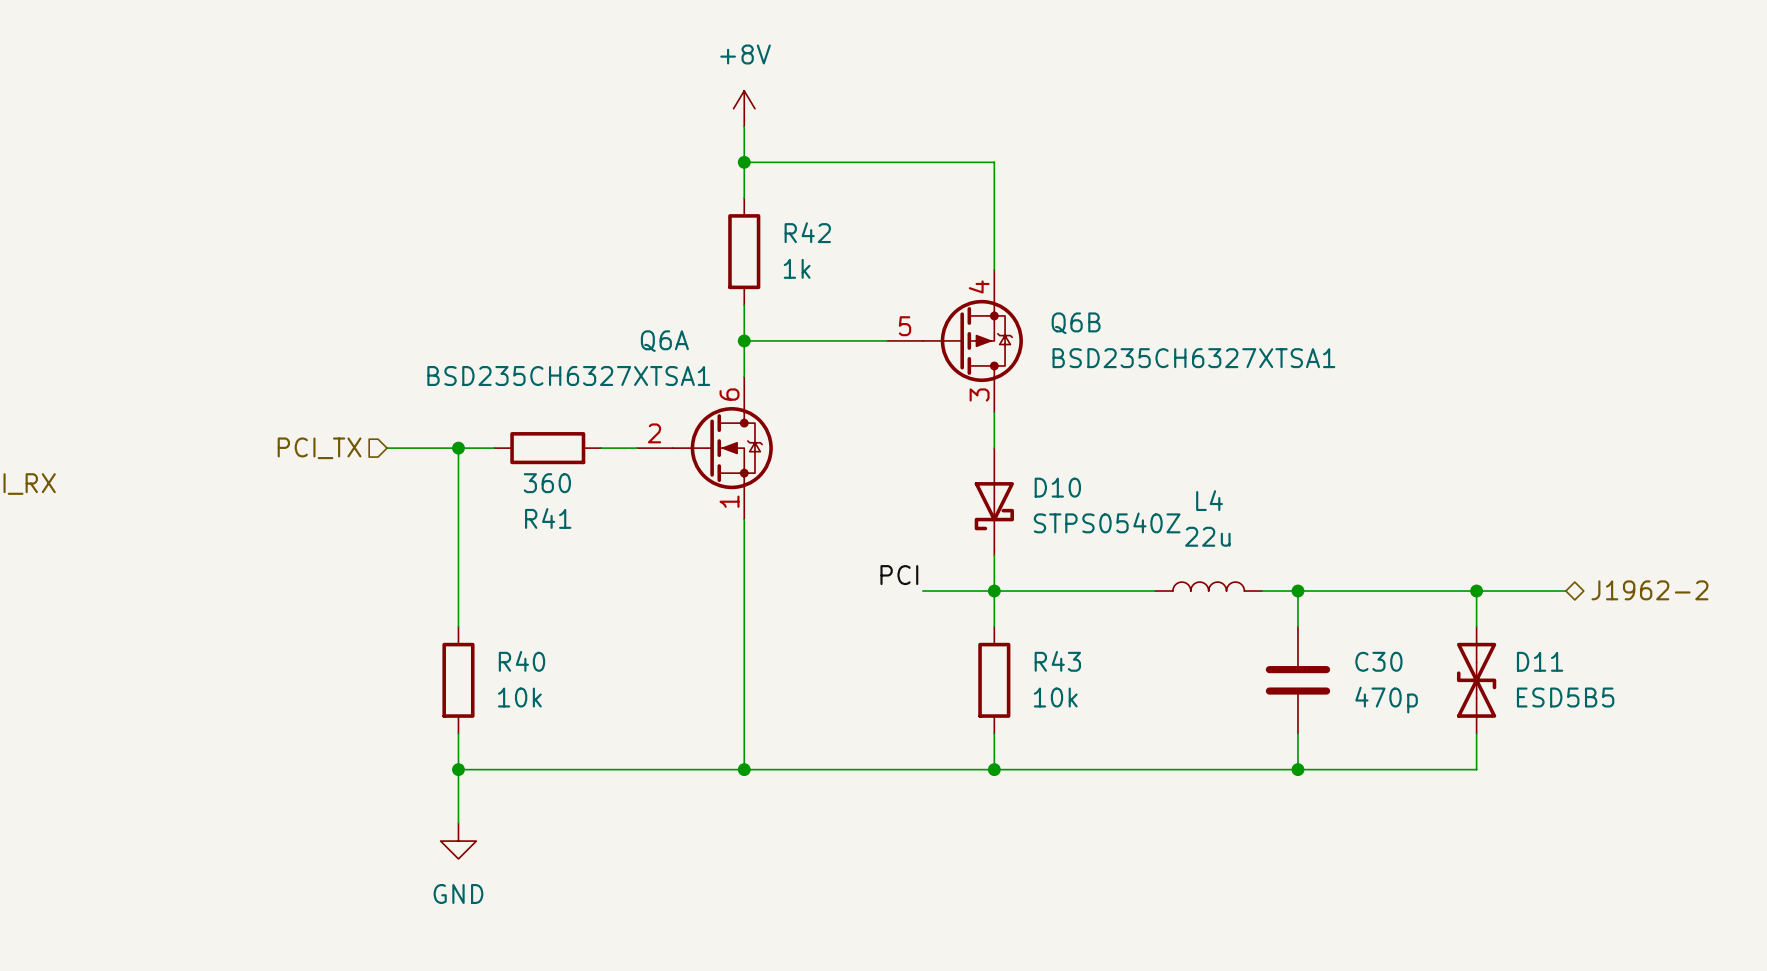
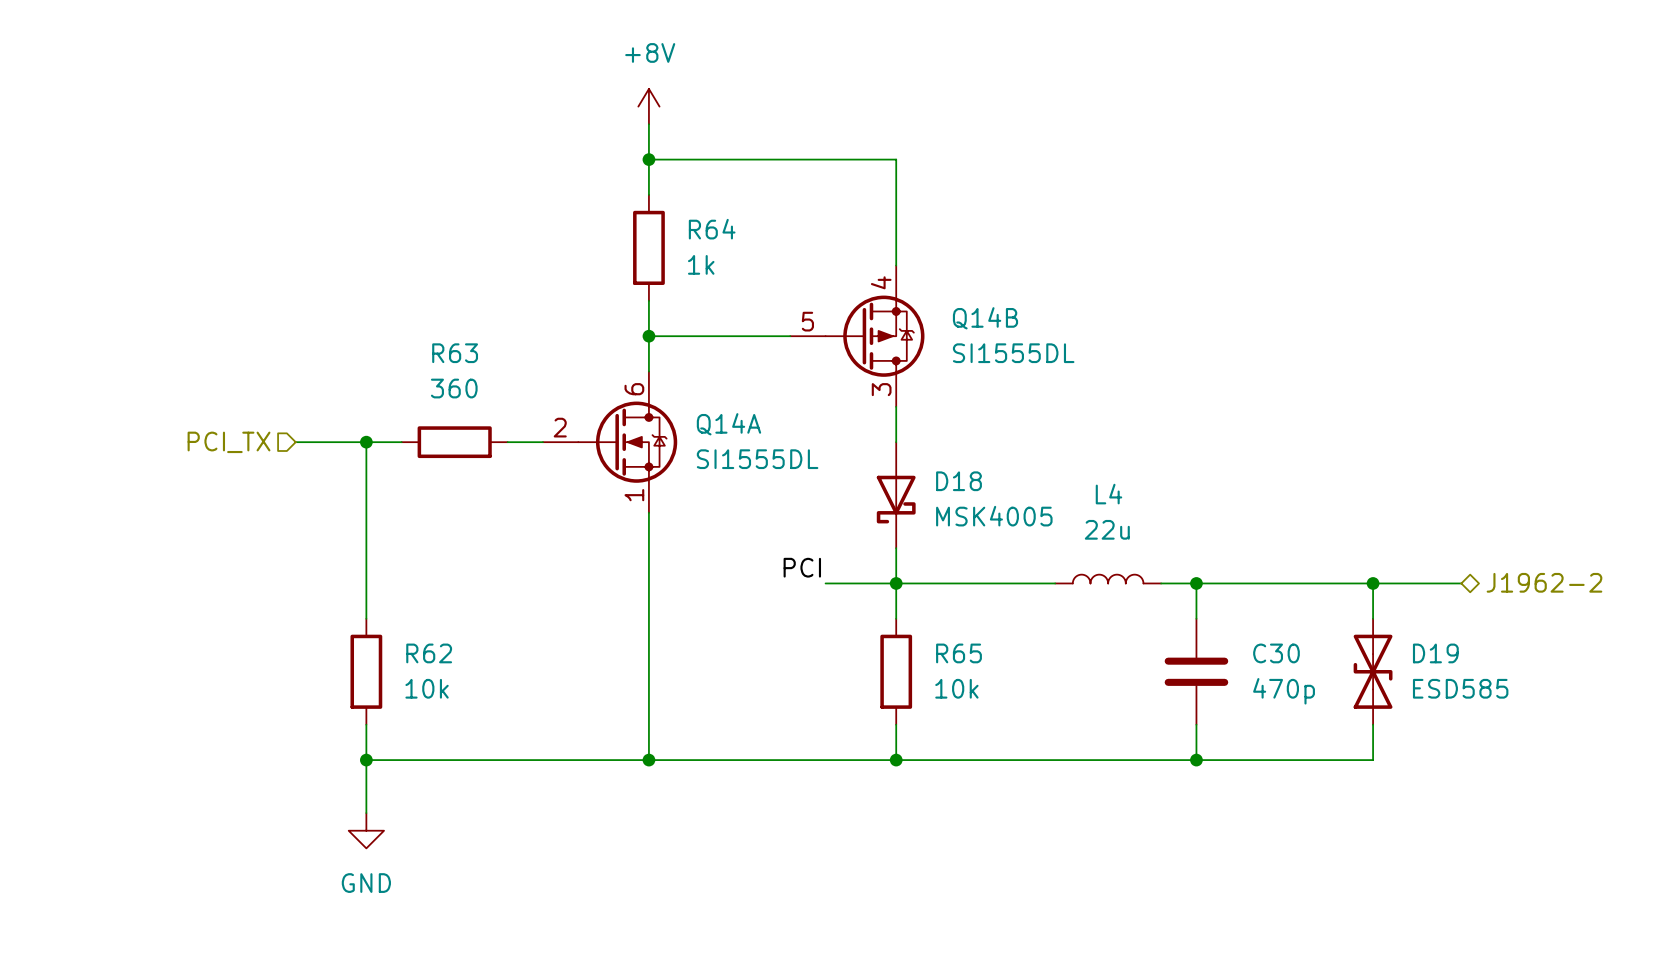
R42 name: R42 (807, 232) -> R64 (712, 229)
Q6B name: Q6B (1076, 323) -> Q14B (985, 318)
Q6A name: Q6A (664, 341) -> Q14A (728, 424)
Q6B value: BSD235CH6327XTSA1 (1193, 358) -> SI1555DL (1013, 353)
Q6A value: BSD235CH6327XTSA1 (568, 376) -> SI1555DL (757, 459)
R41 value position: 360 (547, 483) -> 360 (454, 388)
D10 name: D10 (1057, 487) -> D18 (959, 481)
R41 name: R41 (548, 518) -> R63 (455, 353)
D10 value: STPS0540Z (1107, 522) -> MSK4005 (994, 516)
R40 name: R40 (521, 661) -> R62 (429, 653)
R43 name: R43 (1057, 661) -> R65 (959, 653)
D11 name: D11 (1540, 661) -> D19 (1435, 653)
D11 value: ESD5B5 (1565, 697) -> ESD585 (1460, 688)

